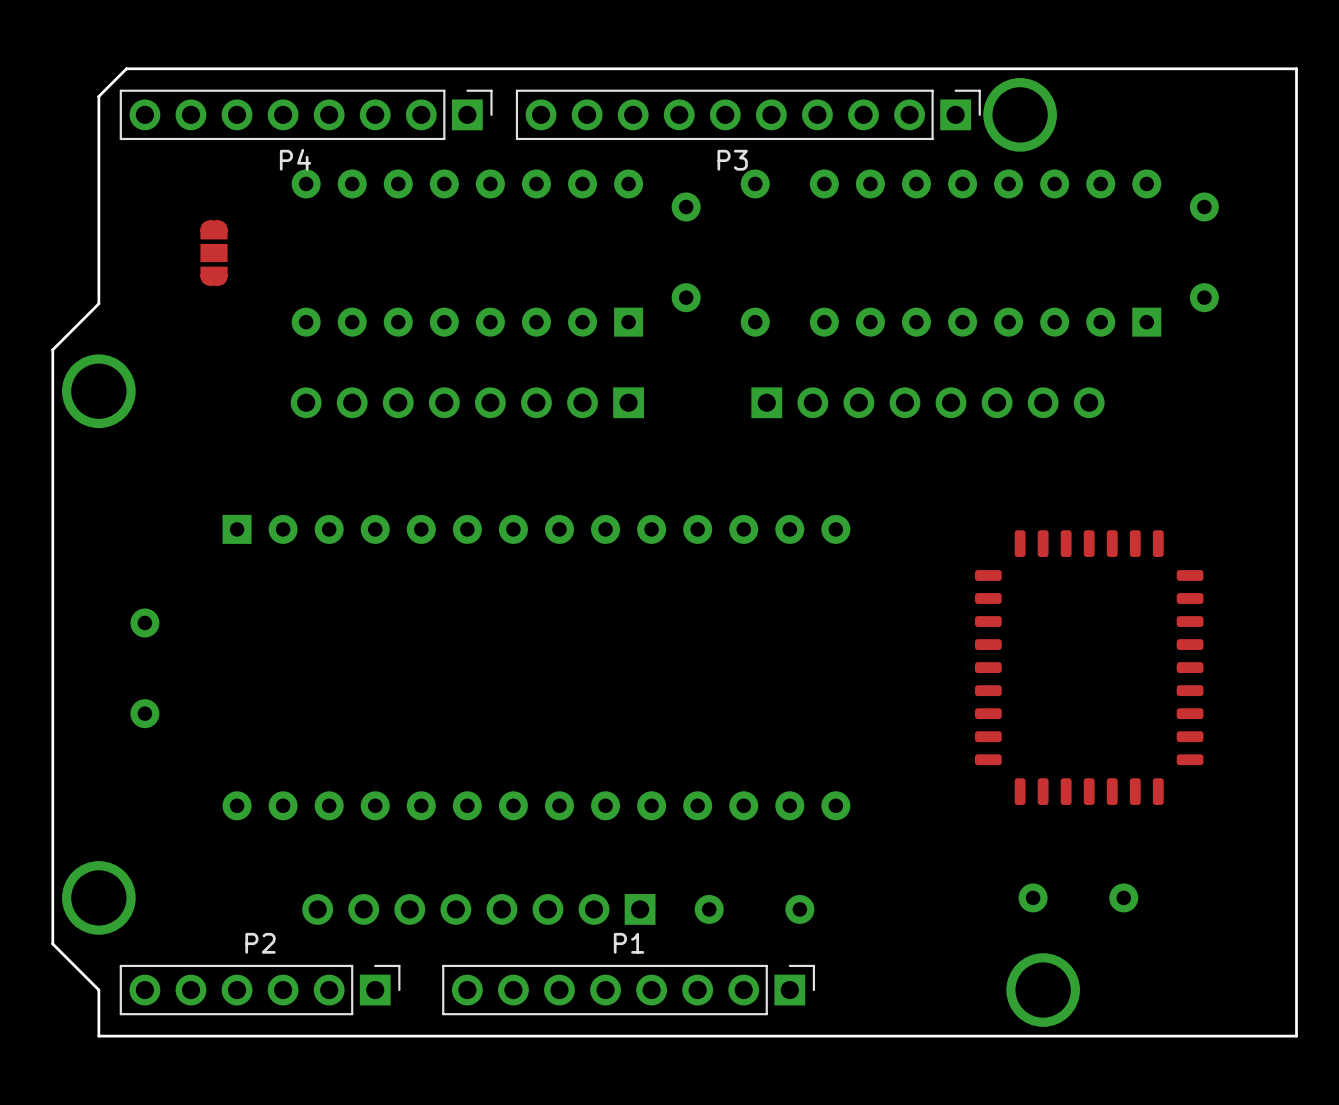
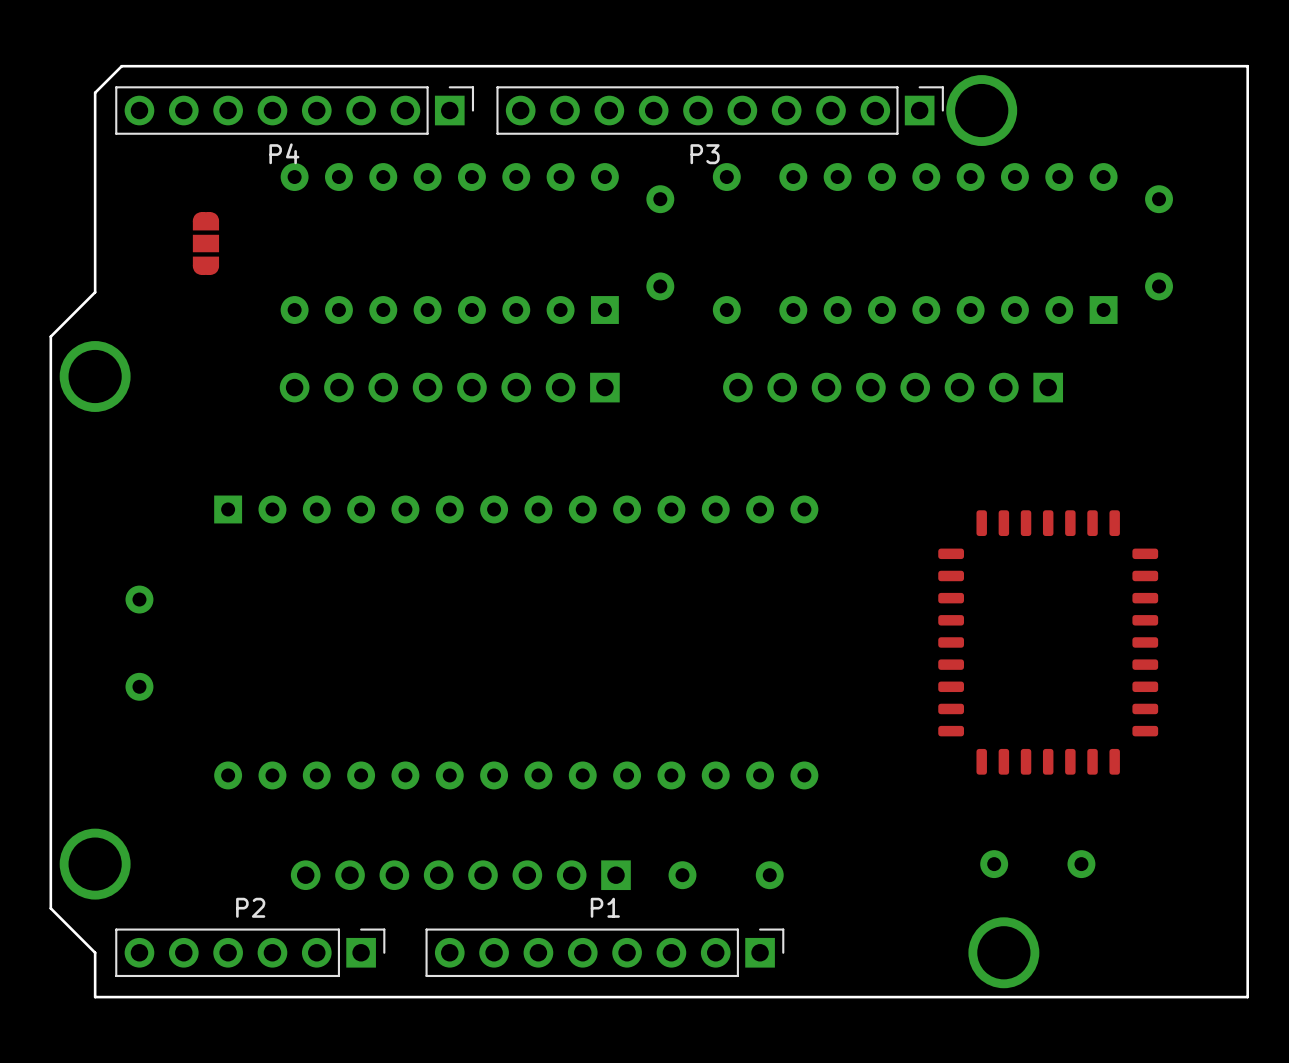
part rotation: 0° (927, 402) -> 180° (893, 387)

